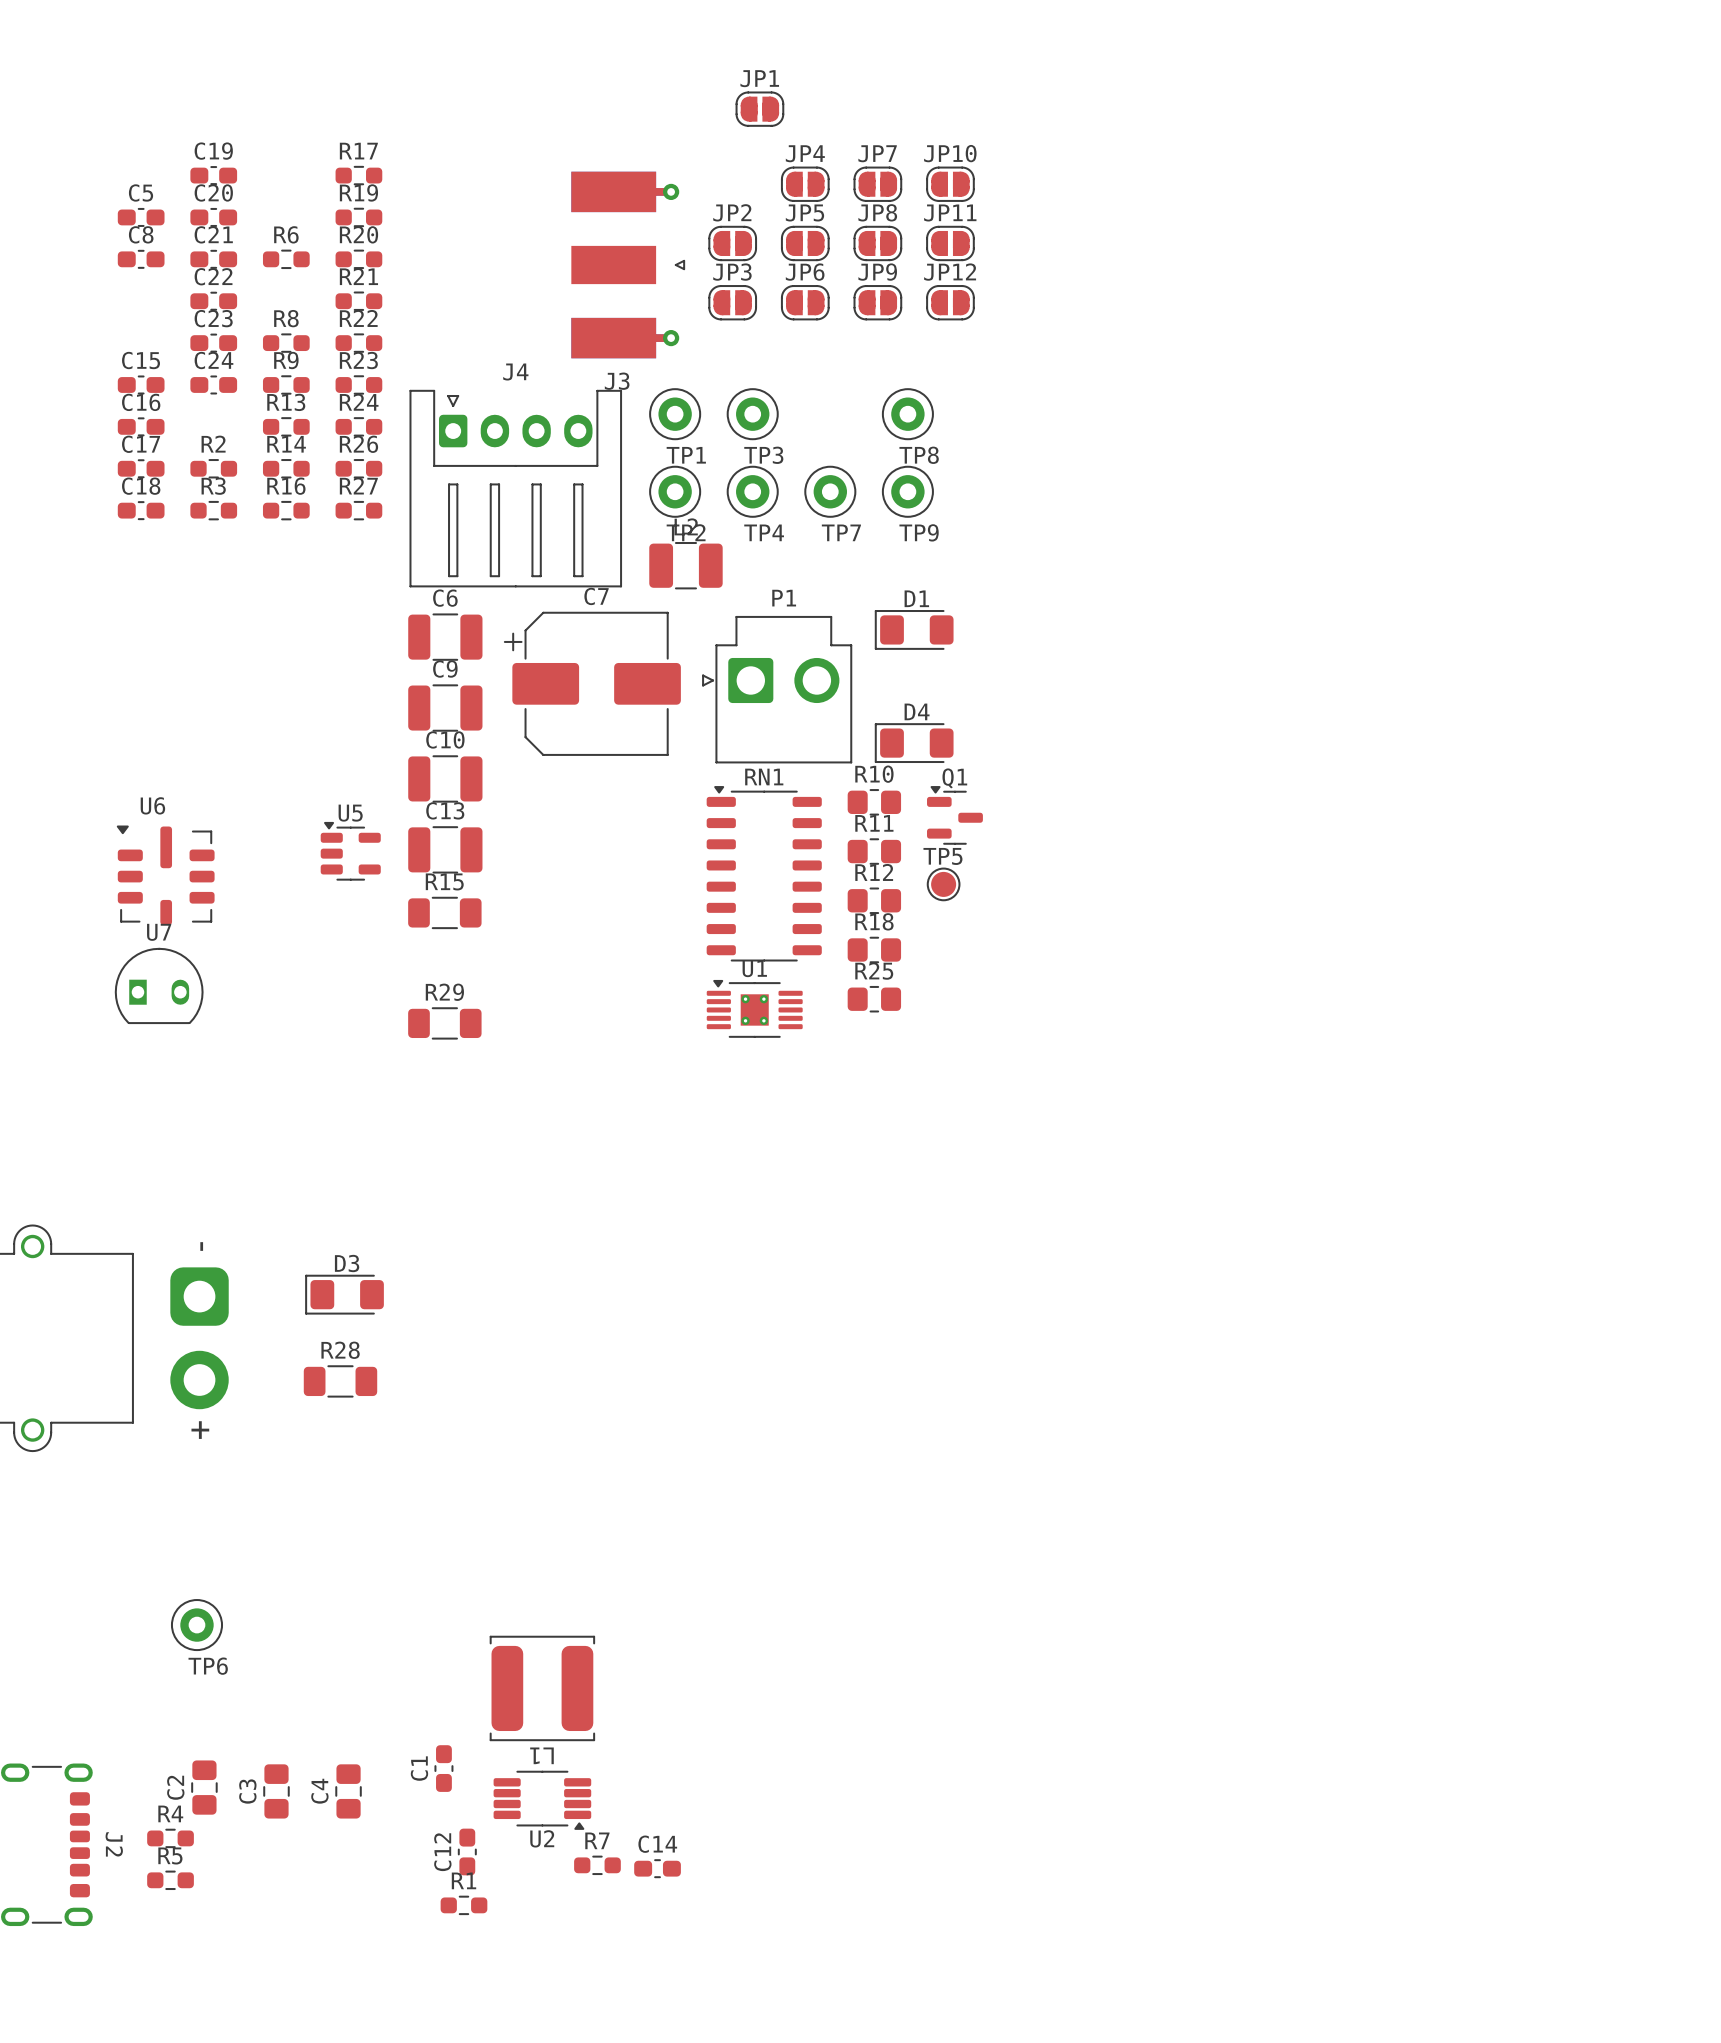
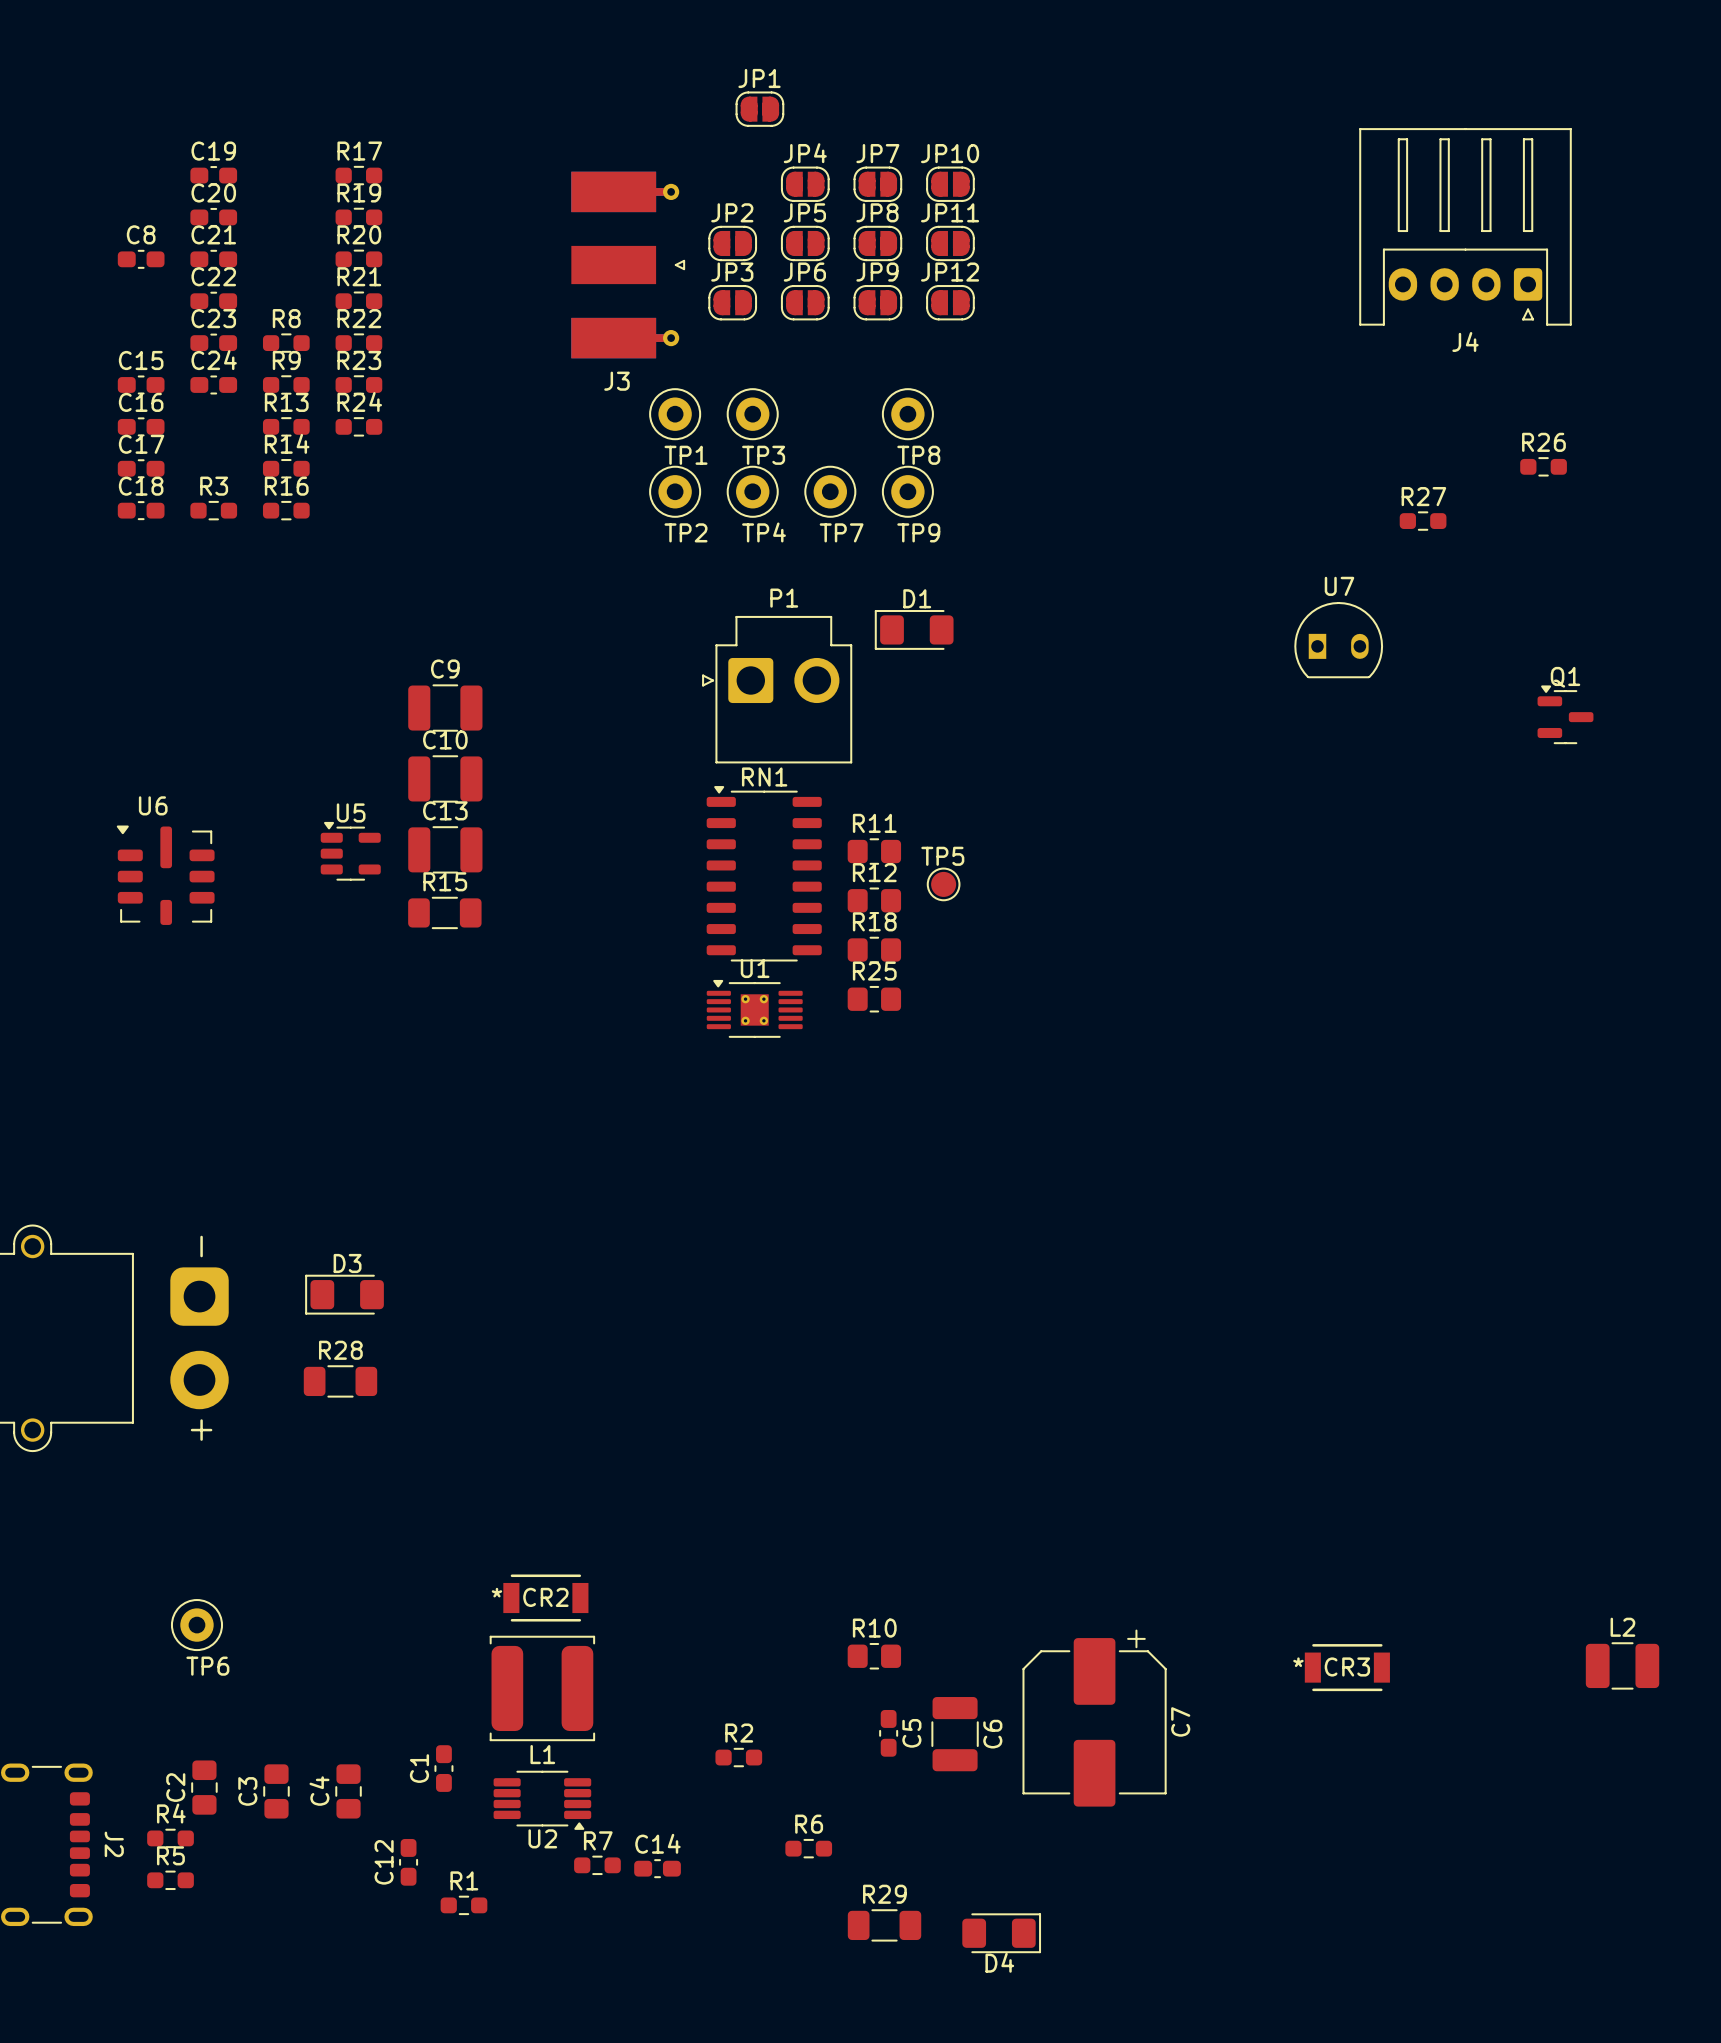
C5 rotation: 0° (141, 217) -> 90° clockwise (888, 1733)
C5 position: (141, 217) -> (888, 1733)
R6 position: (286, 259) -> (808, 1848)
R2 position: (213, 468) -> (738, 1757)
R26 position: (358, 468) -> (1543, 466)
J4 rotation: 0° (515, 488) -> 180° (1465, 226)
J4 position: (515, 488) -> (1465, 226)
R27 position: (358, 510) -> (1423, 521)
L2 position: (685, 565) -> (1622, 1665)
C6 rotation: 0° (445, 637) -> 90° clockwise (955, 1734)
C6 position: (445, 637) -> (955, 1734)
C7 rotation: 0° (592, 683) -> 90° clockwise (1094, 1718)
C7 position: (592, 683) -> (1094, 1718)
D4 rotation: 0° (914, 743) -> 180° (1001, 1933)
D4 position: (914, 743) -> (1001, 1933)
R10 position: (874, 802) -> (874, 1656)
Q1 position: (954, 815) -> (1565, 714)
U7 position: (159, 985) -> (1338, 640)
R29 position: (444, 1023) -> (884, 1925)
CR2: none -> (545, 1598)
CR3: none -> (1347, 1667)
L1 name rotation: 0° (541, 1755) -> 180° (542, 1754)
C12 position: (467, 1851) -> (408, 1862)

